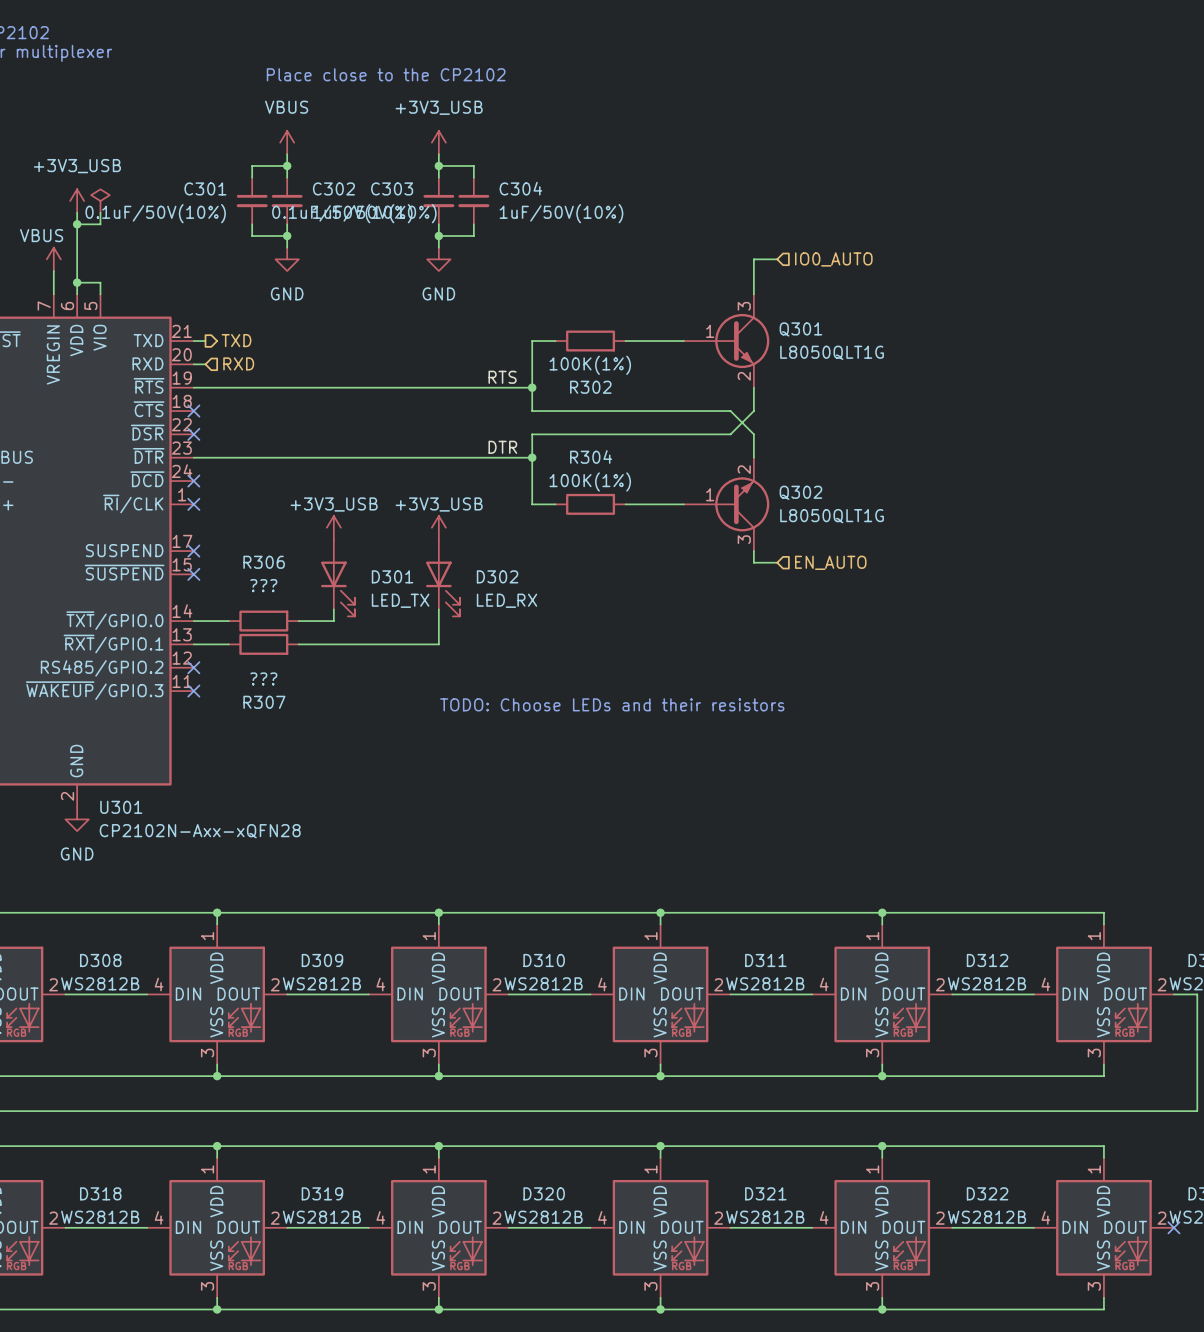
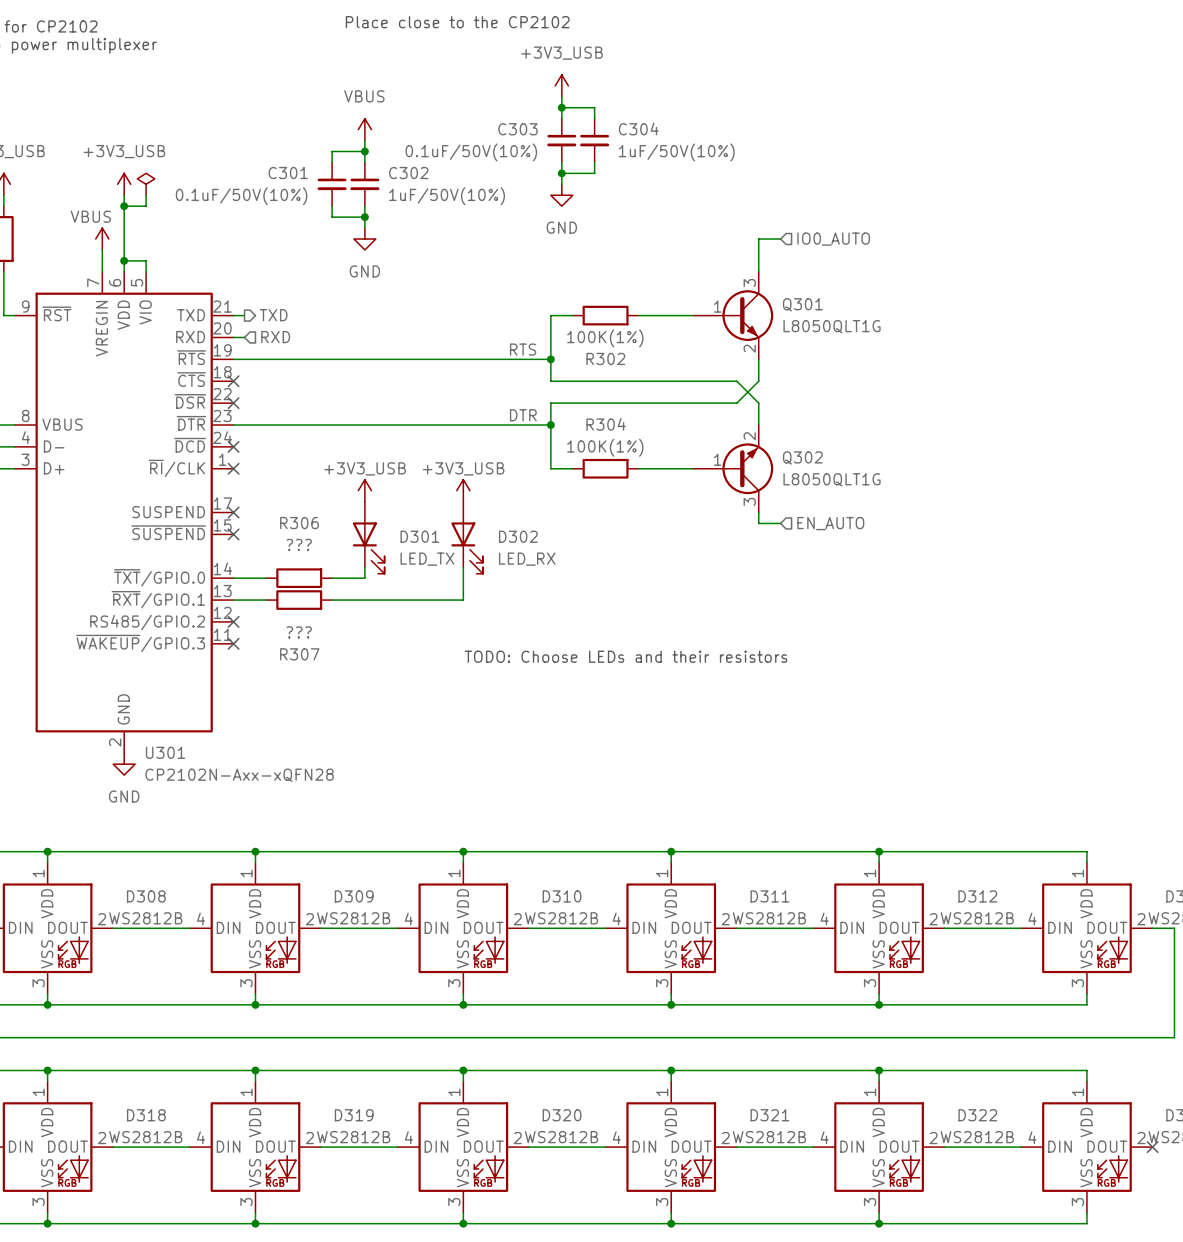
text position: Place close to the CP2102 (386, 74) -> Place close to the CP2102 (457, 22)
junction: none -> (561, 107)
power symbol position: VBUS (287, 142) -> VBUS (364, 129)
power symbol position: +3V3_USB (438, 142) -> +3V3_USB (561, 85)
wire: (287, 154) (287, 177) -> (364, 140) (364, 162)
wire: (438, 154) (438, 177) -> (561, 96) (561, 118)
wire: (287, 166) (252, 166) (252, 177) -> (364, 151) (332, 151) (332, 162)
junction: (287, 166) -> none
junction: none -> (364, 151)
wire: (438, 166) (473, 166) (473, 177) -> (561, 107) (594, 107) (594, 118)
junction: (438, 166) -> none
junction: none -> (561, 173)
C301 position: (252, 201) -> (332, 184)
C302 position: (287, 201) -> (364, 184)
C303 position: (438, 201) -> (561, 140)
C304 position: (473, 201) -> (594, 140)
power symbol: none -> GND (561, 195)
wire: (252, 224) (252, 236) (287, 236) -> (332, 206) (332, 217) (364, 217)
wire: (287, 224) (287, 247) -> (364, 206) (364, 228)
wire: (438, 224) (438, 247) -> (561, 162) (561, 184)
wire: (473, 224) (473, 236) (438, 236) -> (594, 162) (594, 173) (561, 173)
junction: (287, 236) -> none
junction: none -> (364, 217)
junction: (438, 236) -> none
power symbol position: GND (287, 259) -> GND (364, 239)
power symbol: GND (438, 259) -> none

